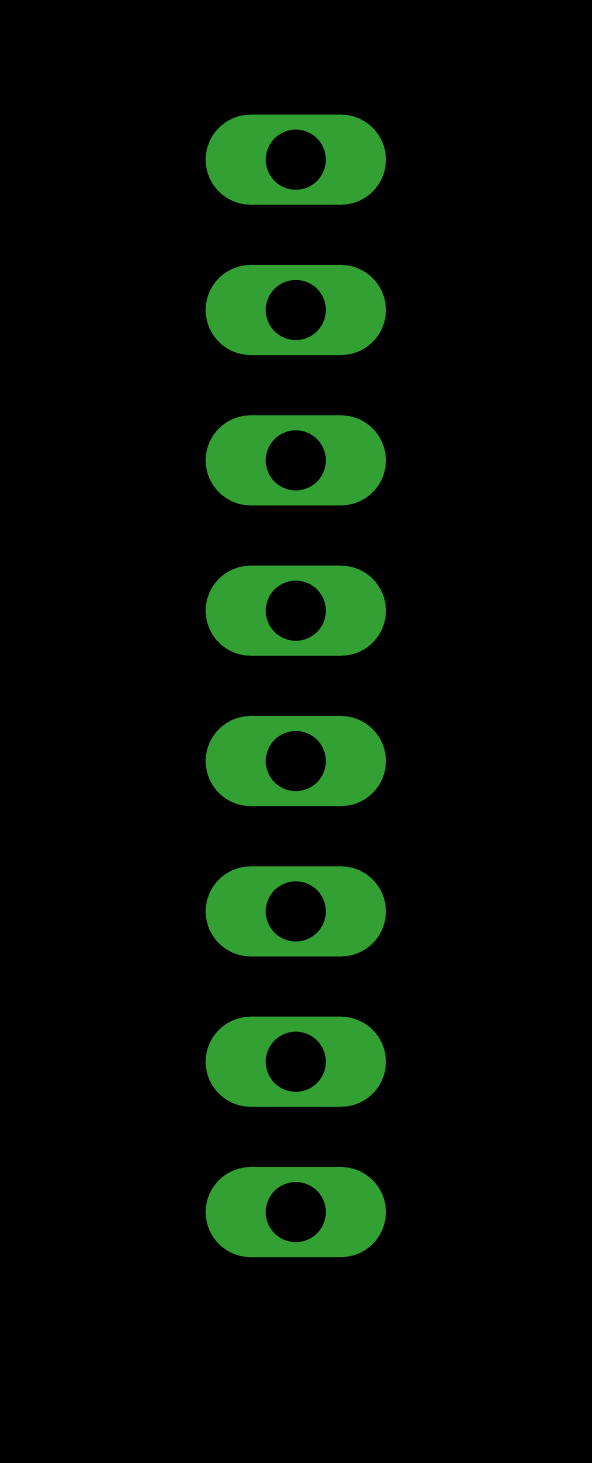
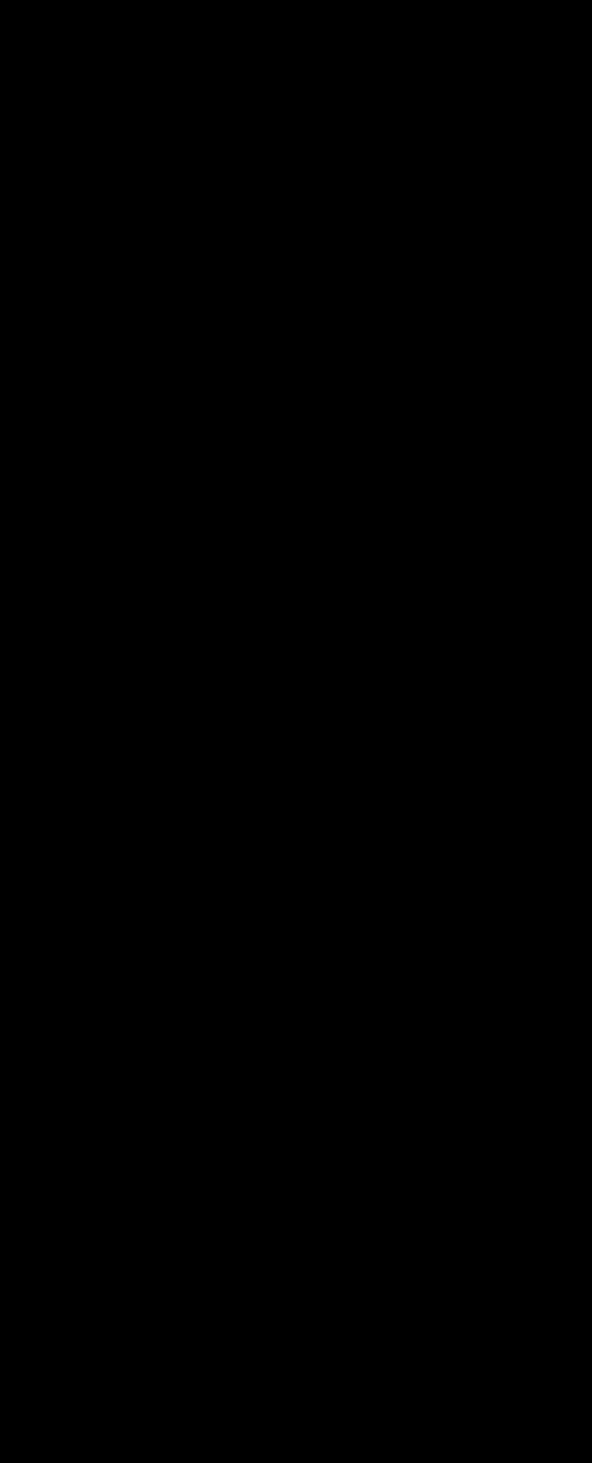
part: (295, 685) -> none

